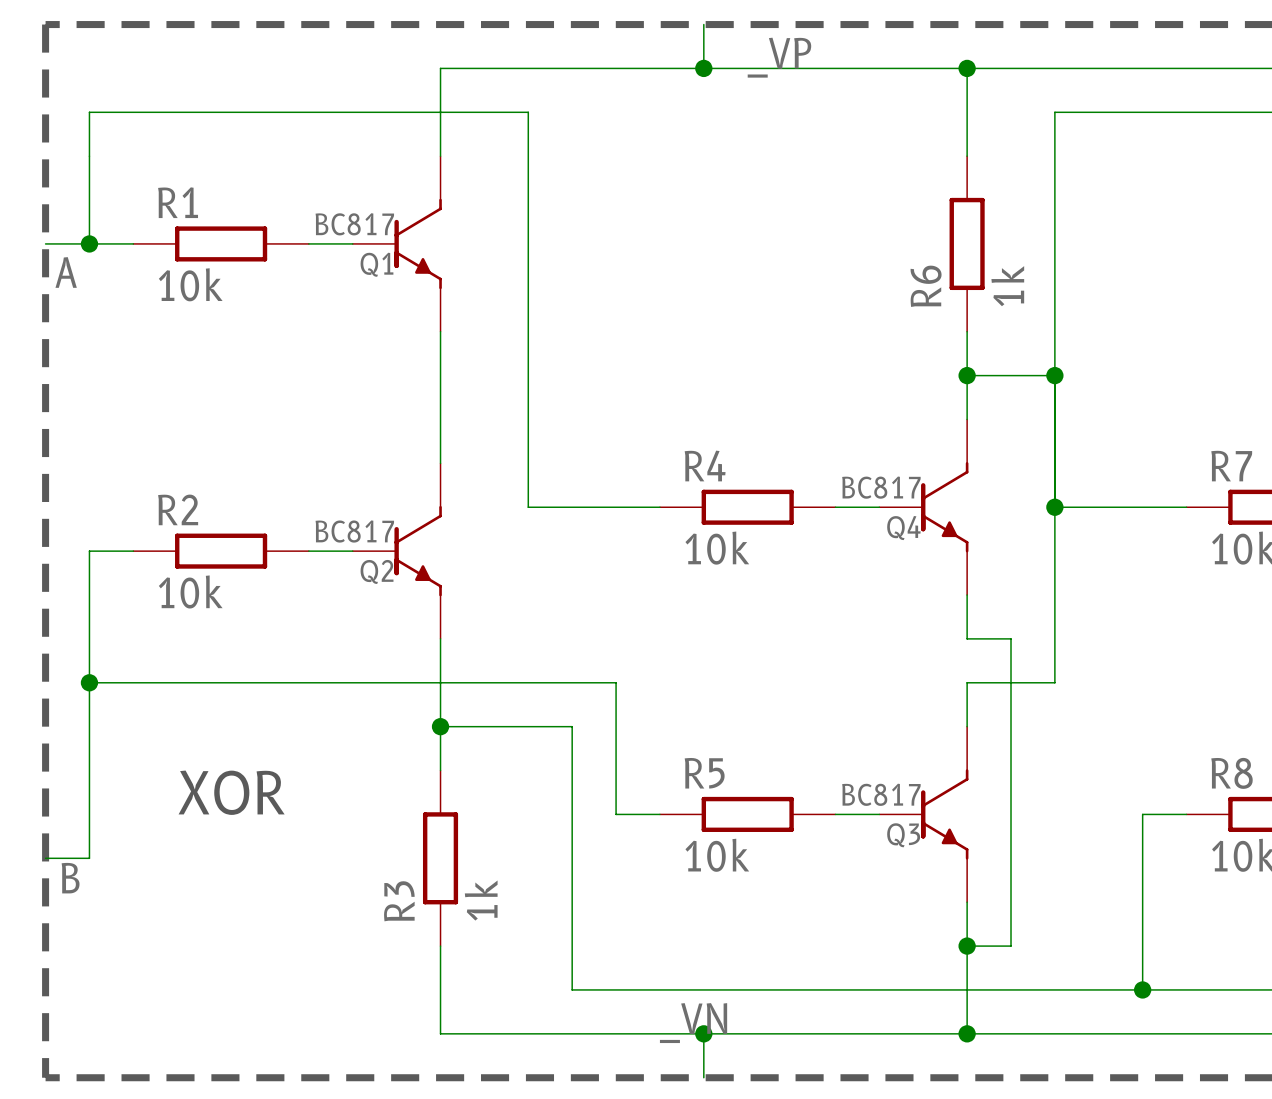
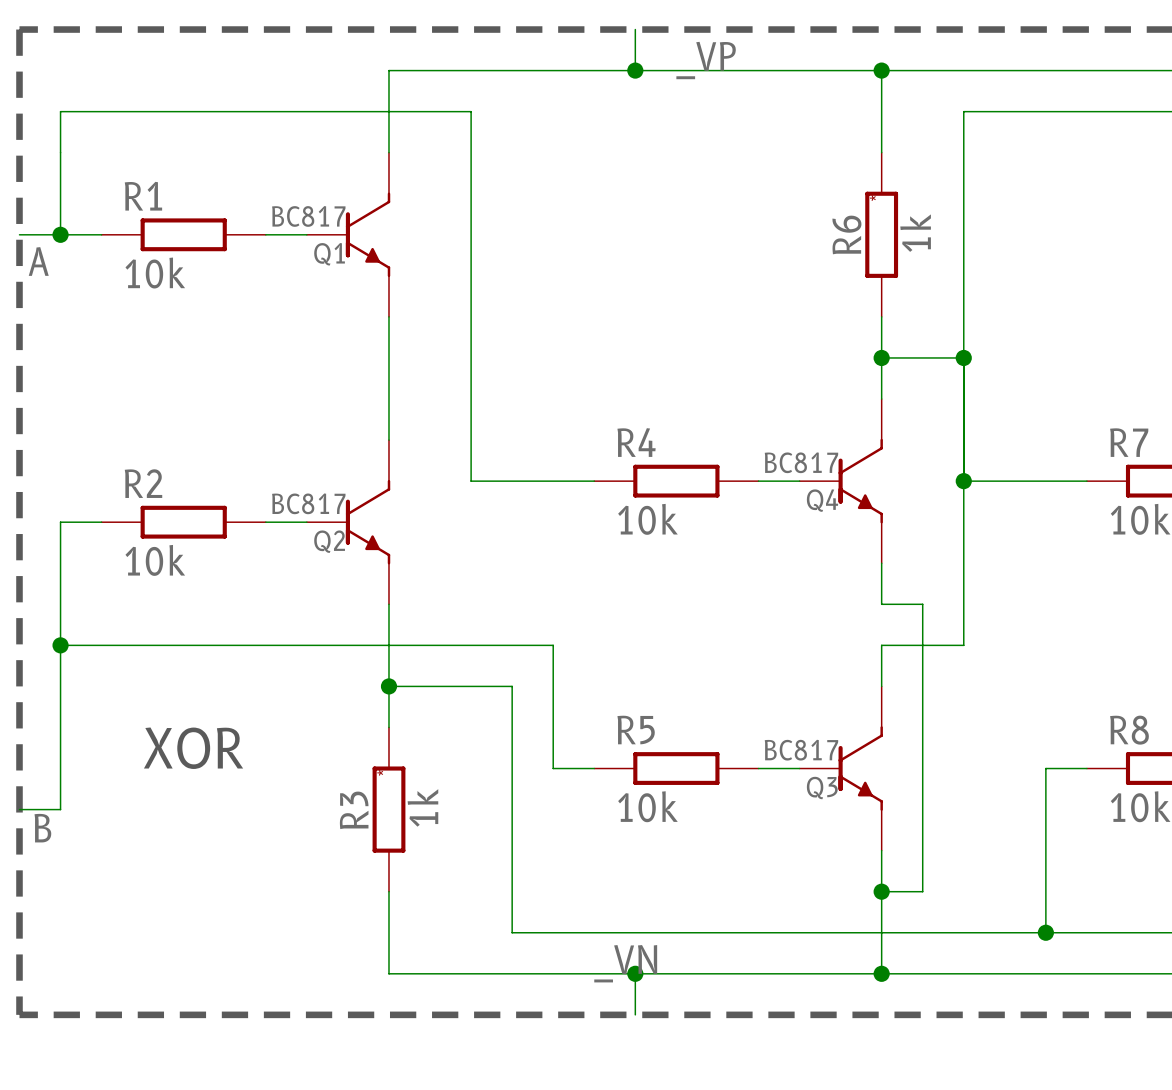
R6 text: none -> * (872, 198)
R6 name position: R6 (926, 286) -> R6 (846, 234)
R6 value position: 1k (1007, 286) -> 1k (915, 233)
R3 text: none -> * (380, 772)
R3 value position: 1k (481, 900) -> 1k (422, 807)
R3 name position: R3 (399, 901) -> R3 (354, 810)

